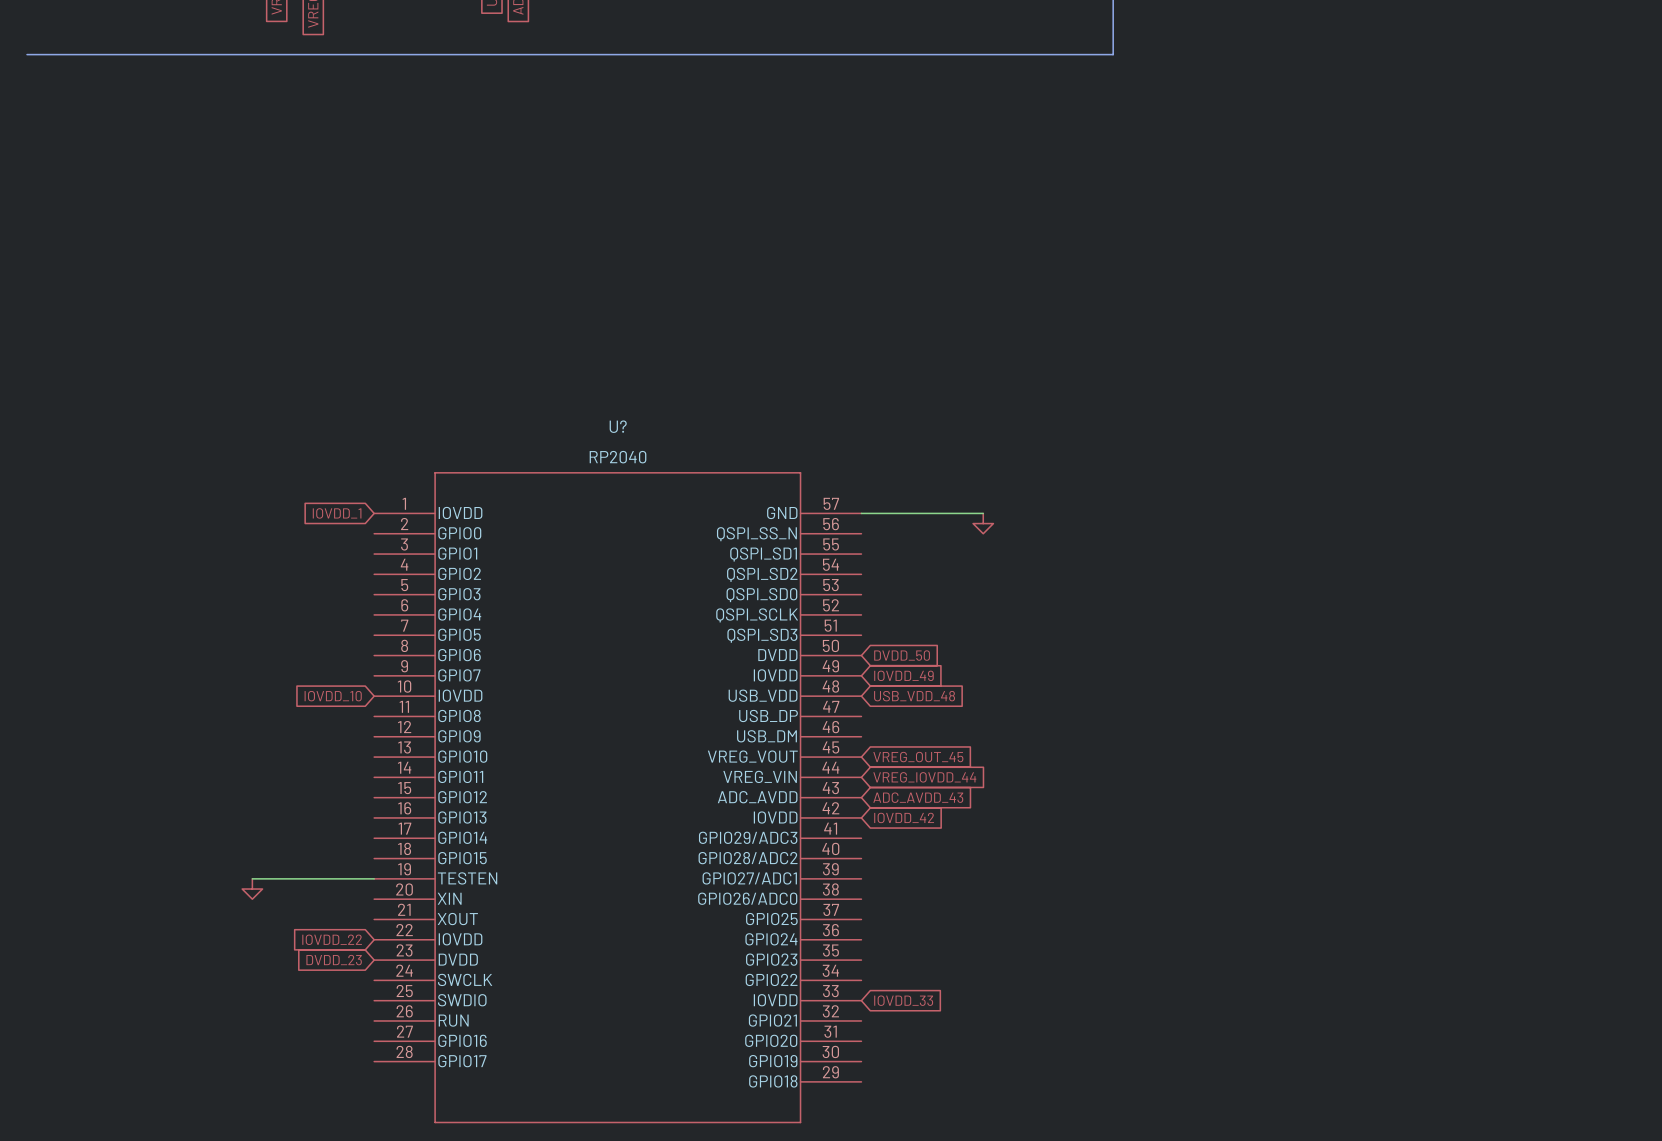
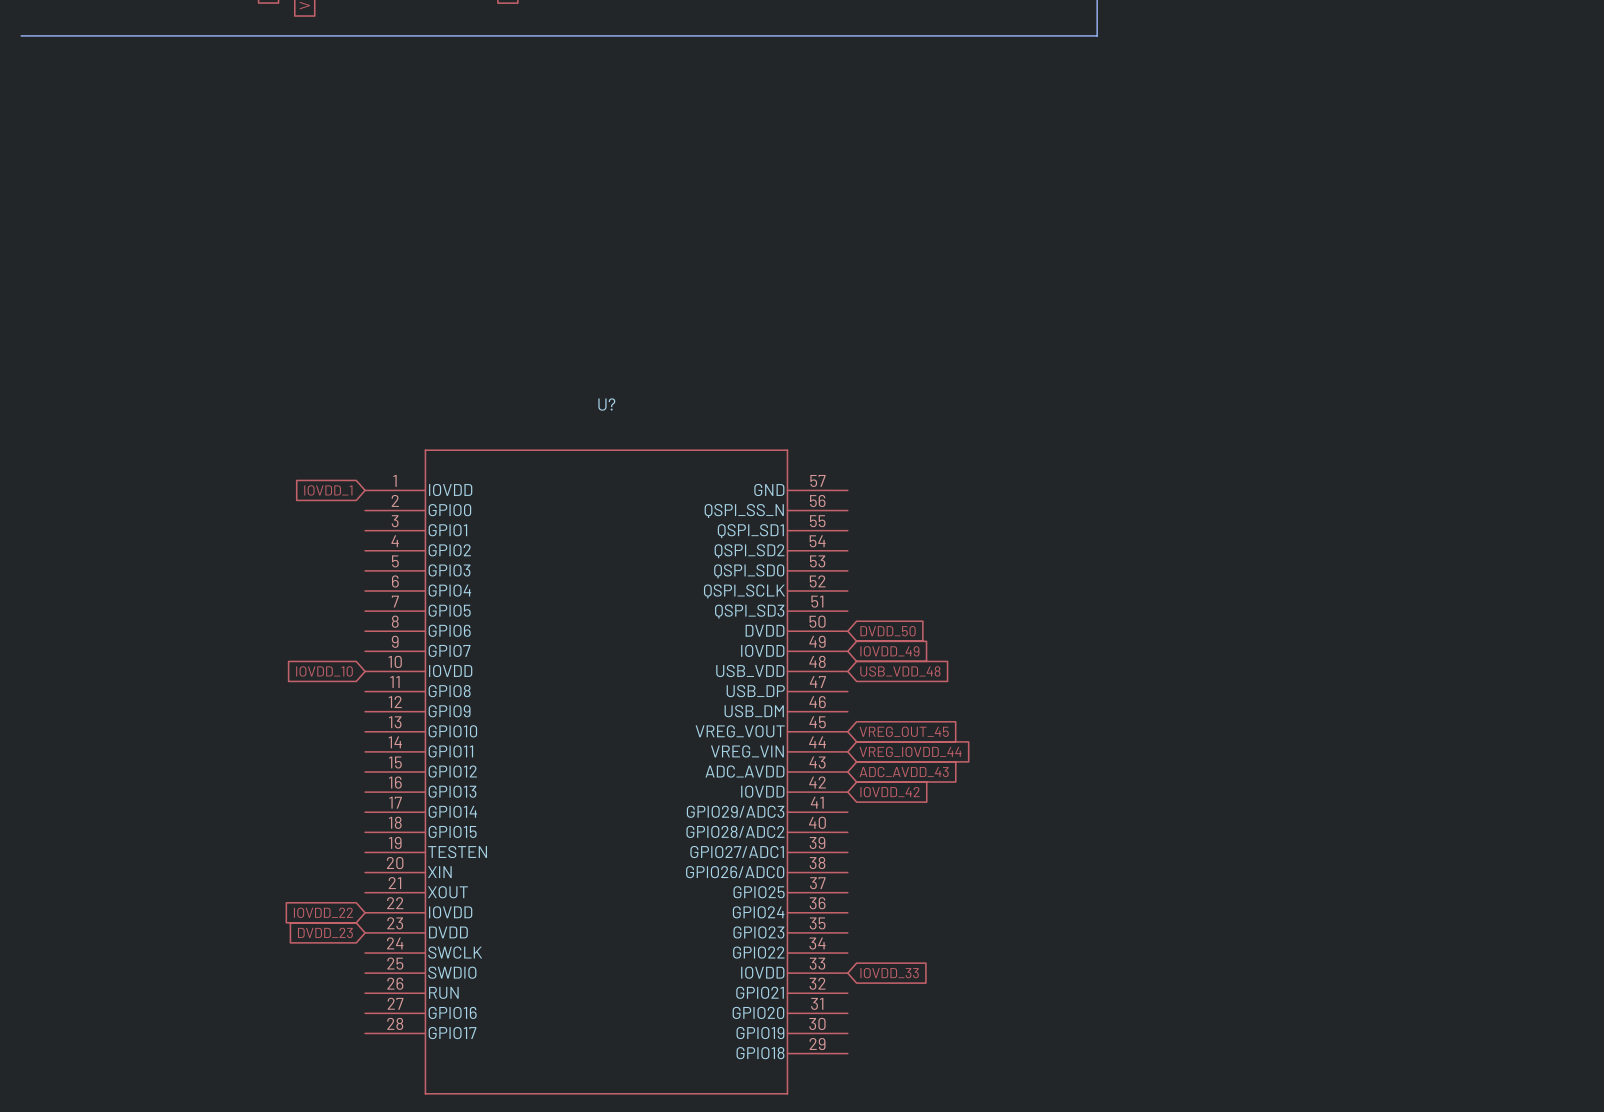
U? value: RP2040 (618, 457) -> none
wire: (861, 513) (983, 513) -> none
power symbol: (983, 523) -> none
wire: (252, 878) (374, 878) -> none
power symbol: (252, 889) -> none

